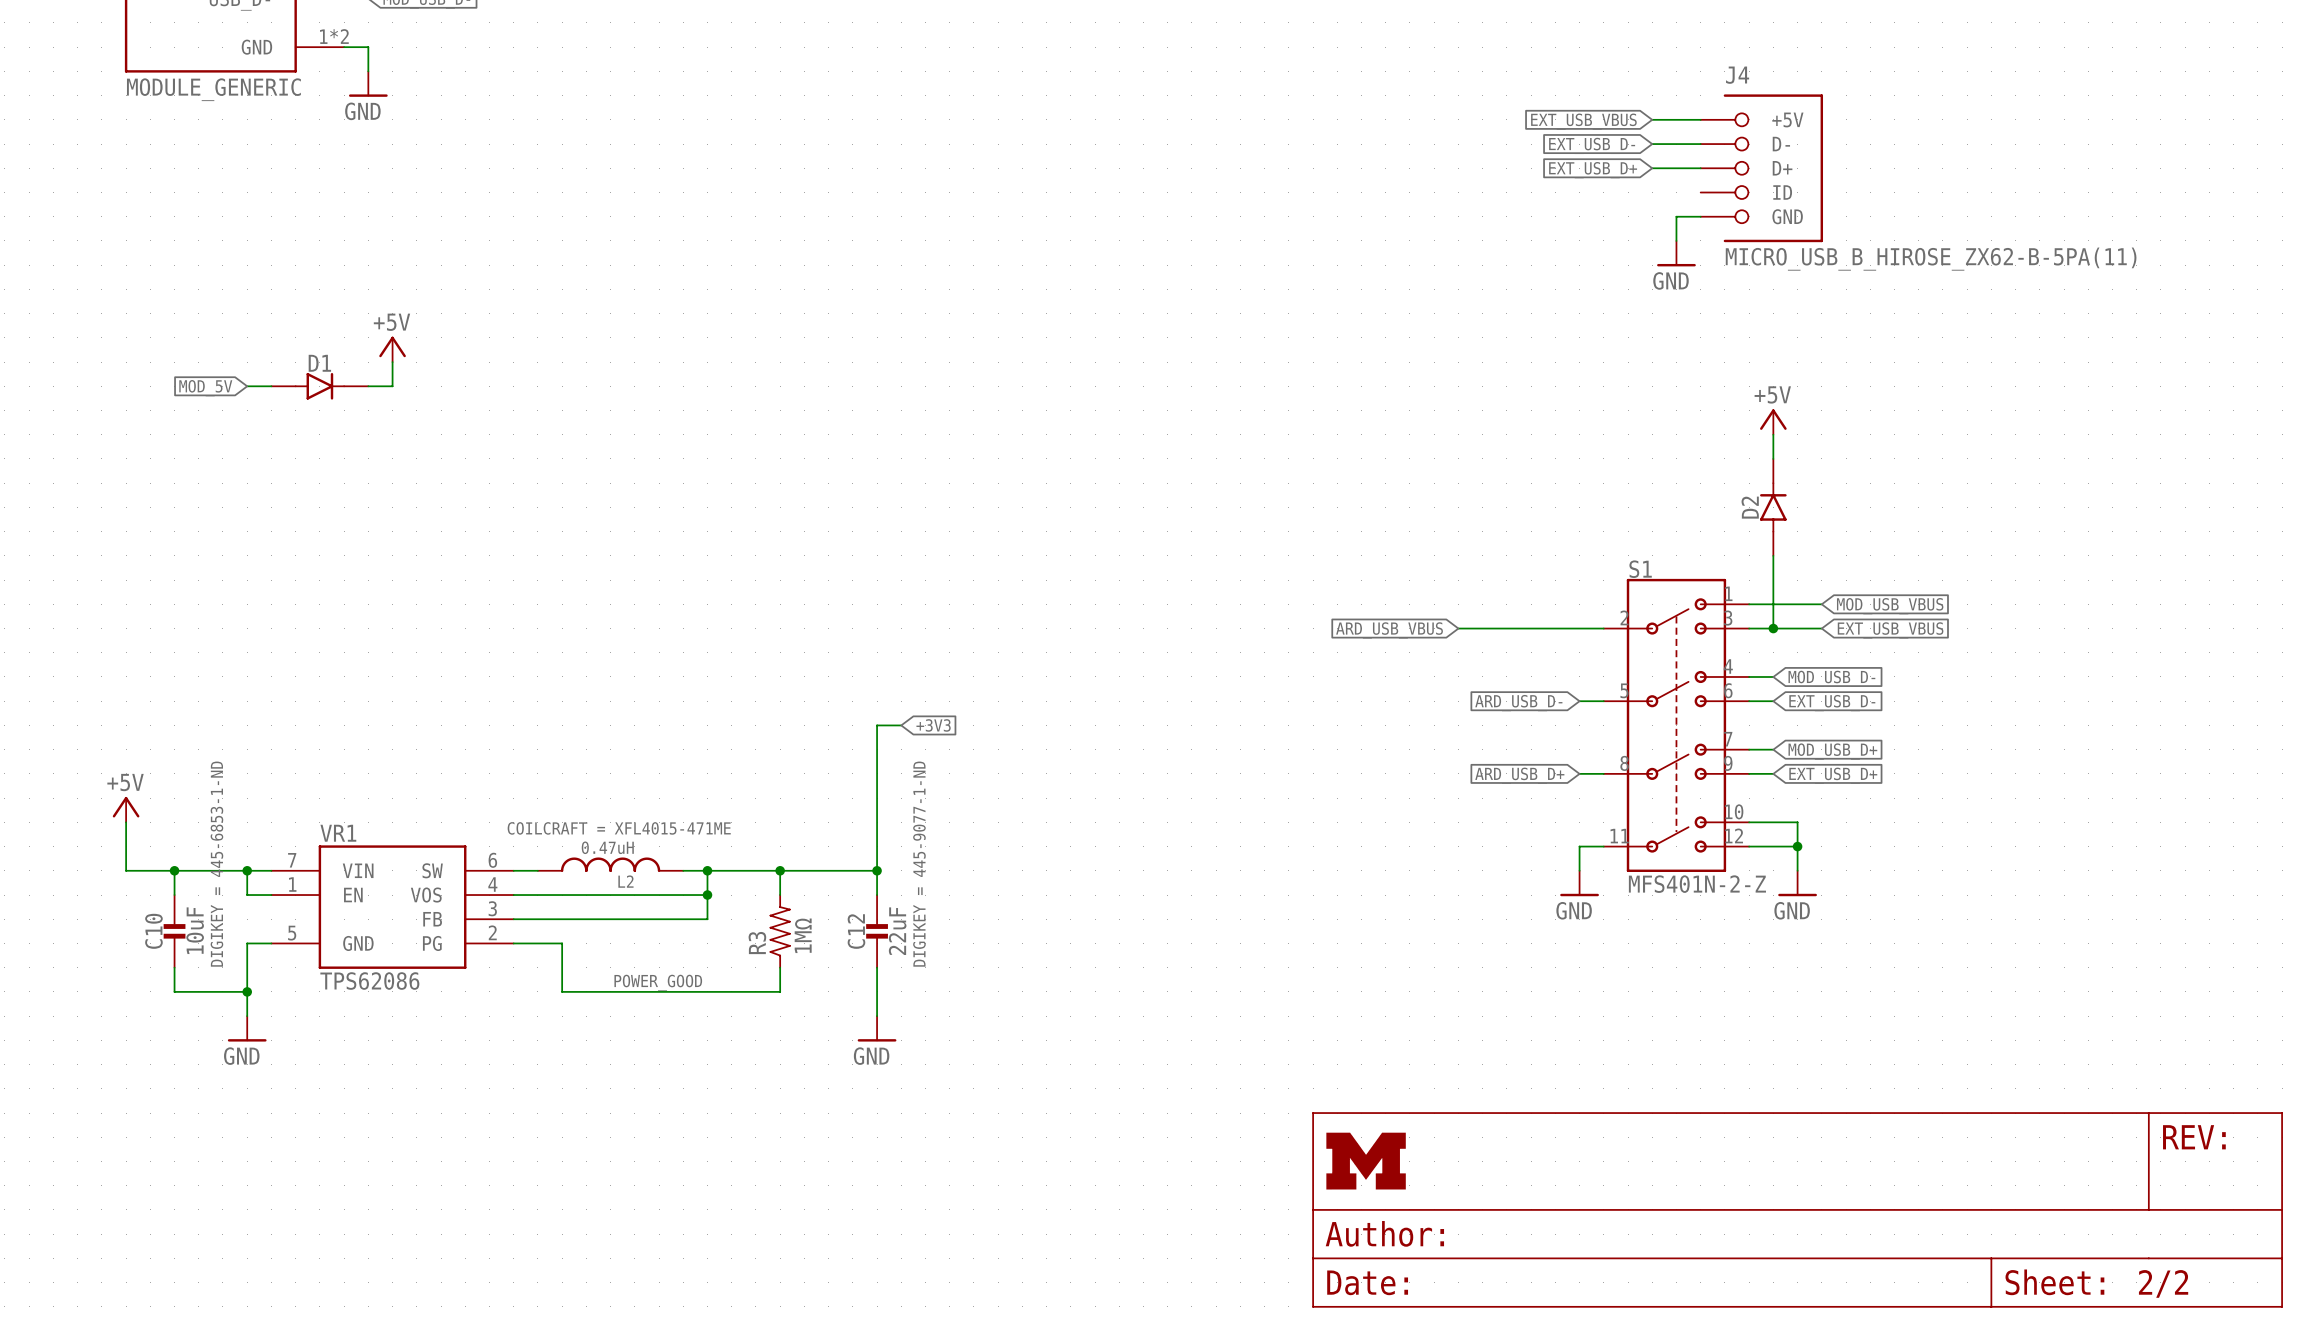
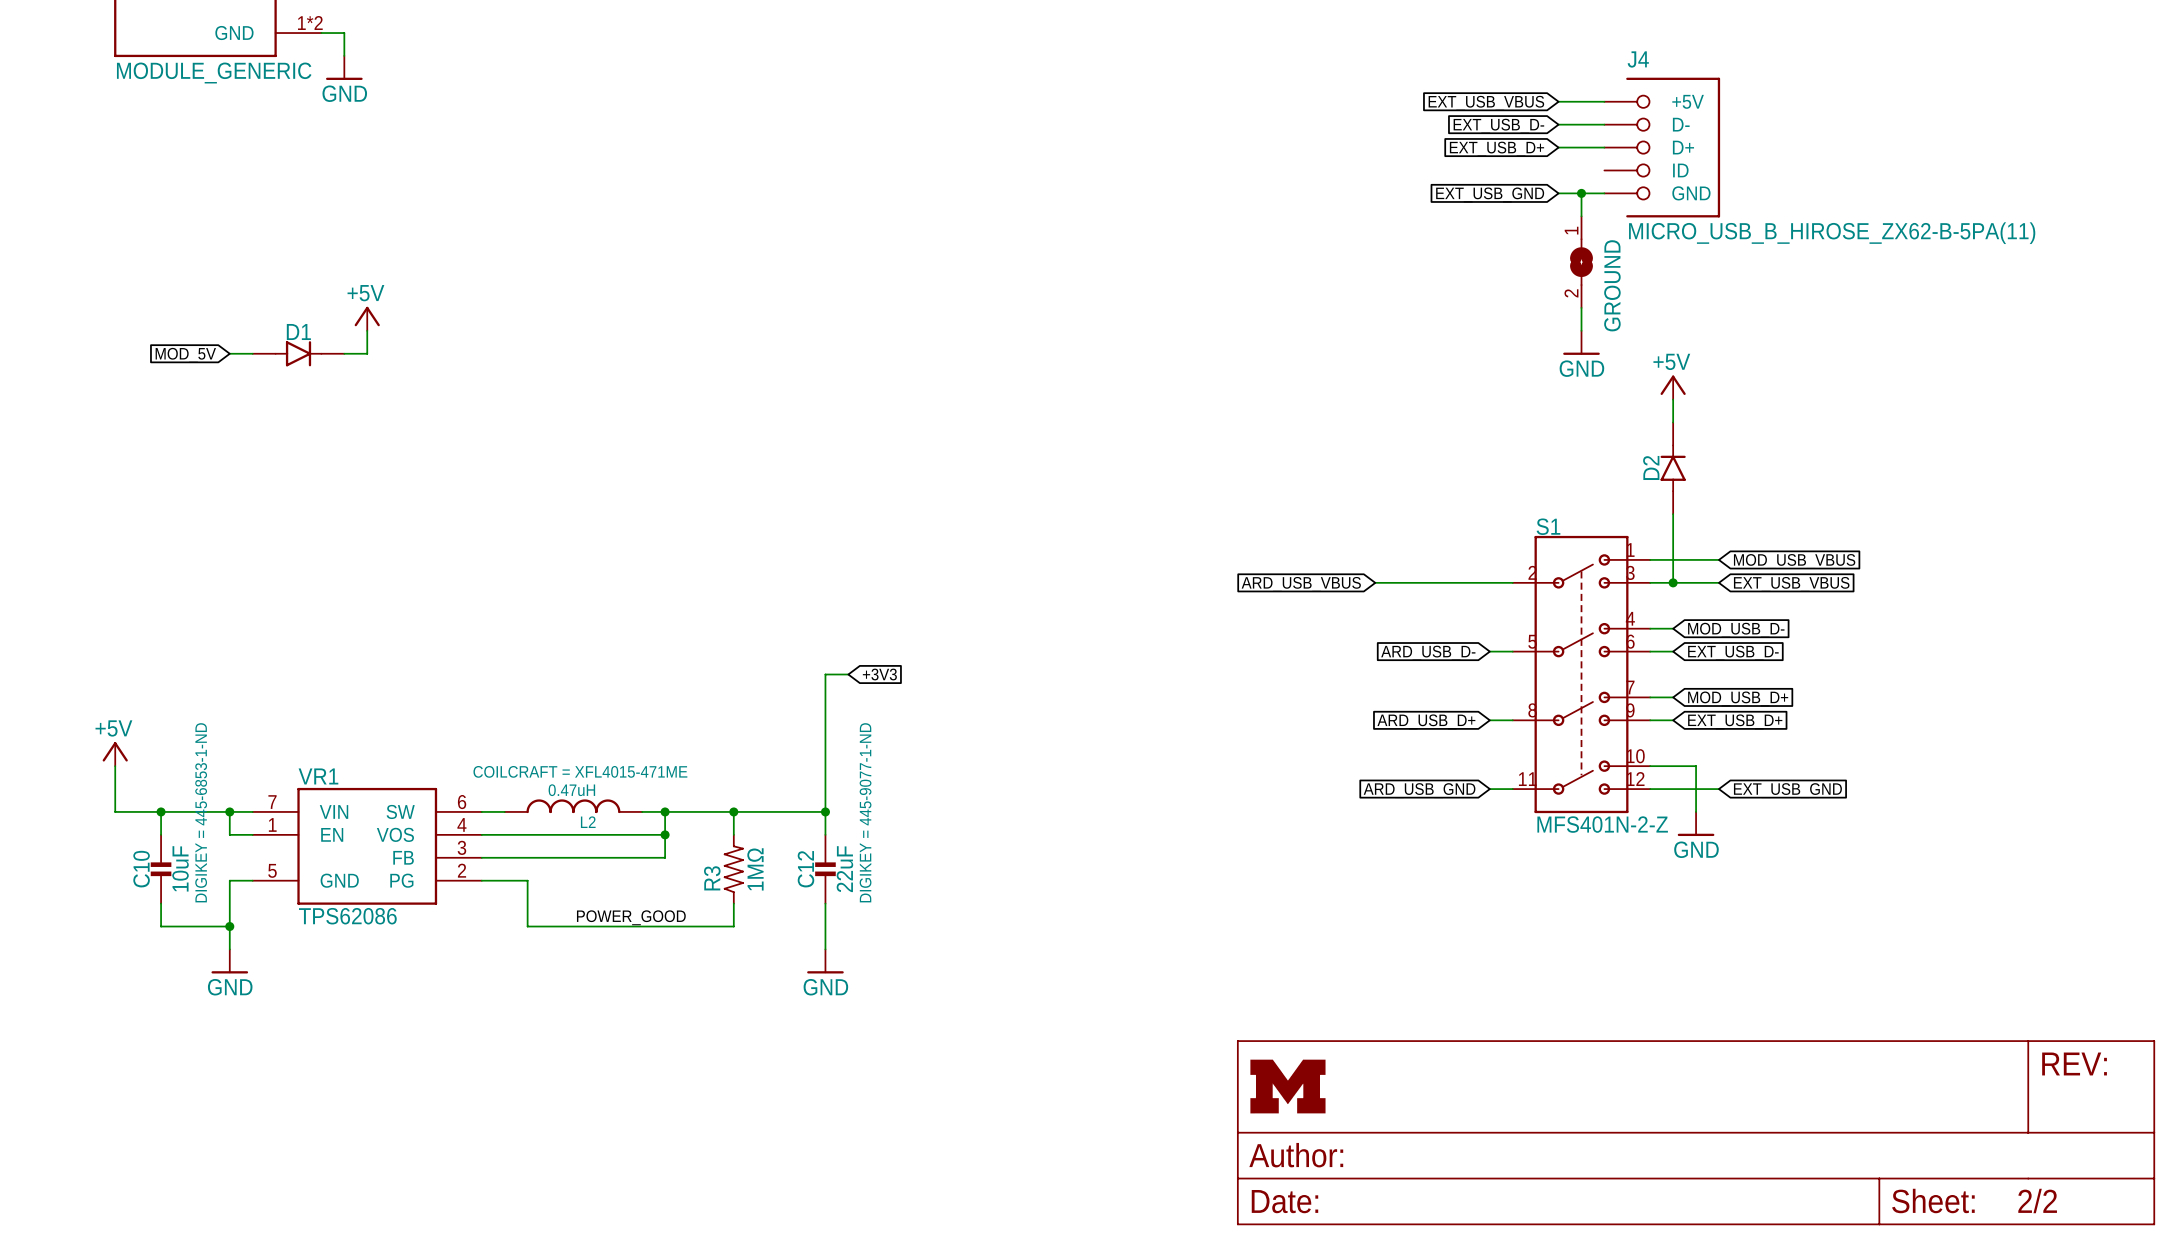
wire: none -> (1558, 193) (1581, 193)
junction: none -> (1581, 193)
global label: none -> EXT_USB_GND (1490, 194)
power symbol position: GND (1676, 253) -> GND (1581, 342)
GROUND: none -> (1581, 262)
wire: none -> (1581, 307) (1581, 330)
wire: (1579, 846) (1579, 870) -> none
wire: none -> (1696, 789) (1718, 789)
junction: (1797, 846) -> none
global label: none -> ARD_USB_GND (1419, 790)
global label: none -> EXT_USB_GND (1787, 790)
power symbol: GND (1579, 883) -> none

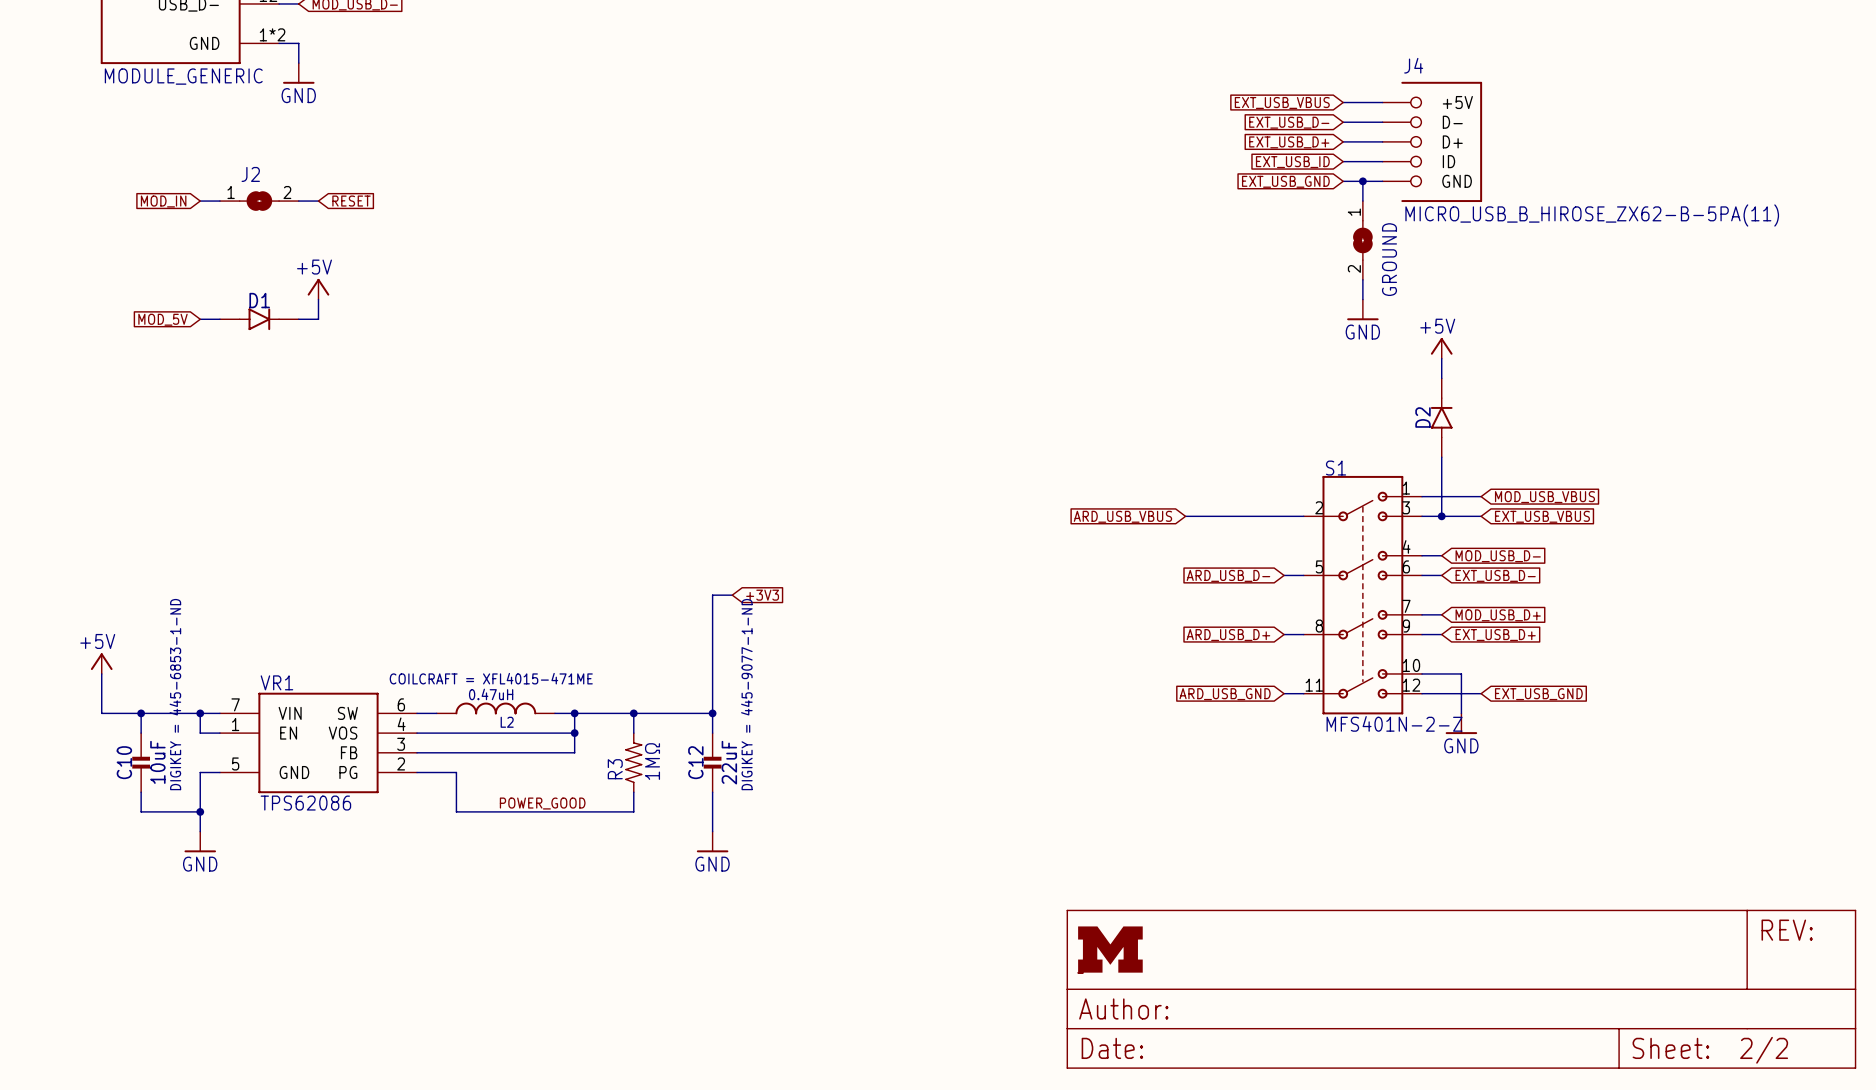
wire: none -> (1343, 161) (1382, 161)
global label: none -> EXT_USB_ID (1292, 162)
wire: none -> (200, 201) (219, 201)
J2: none -> (259, 201)
wire: none -> (298, 201) (318, 201)
global label: none -> RESET (351, 201)
global label: none -> MOD_IN (163, 201)

